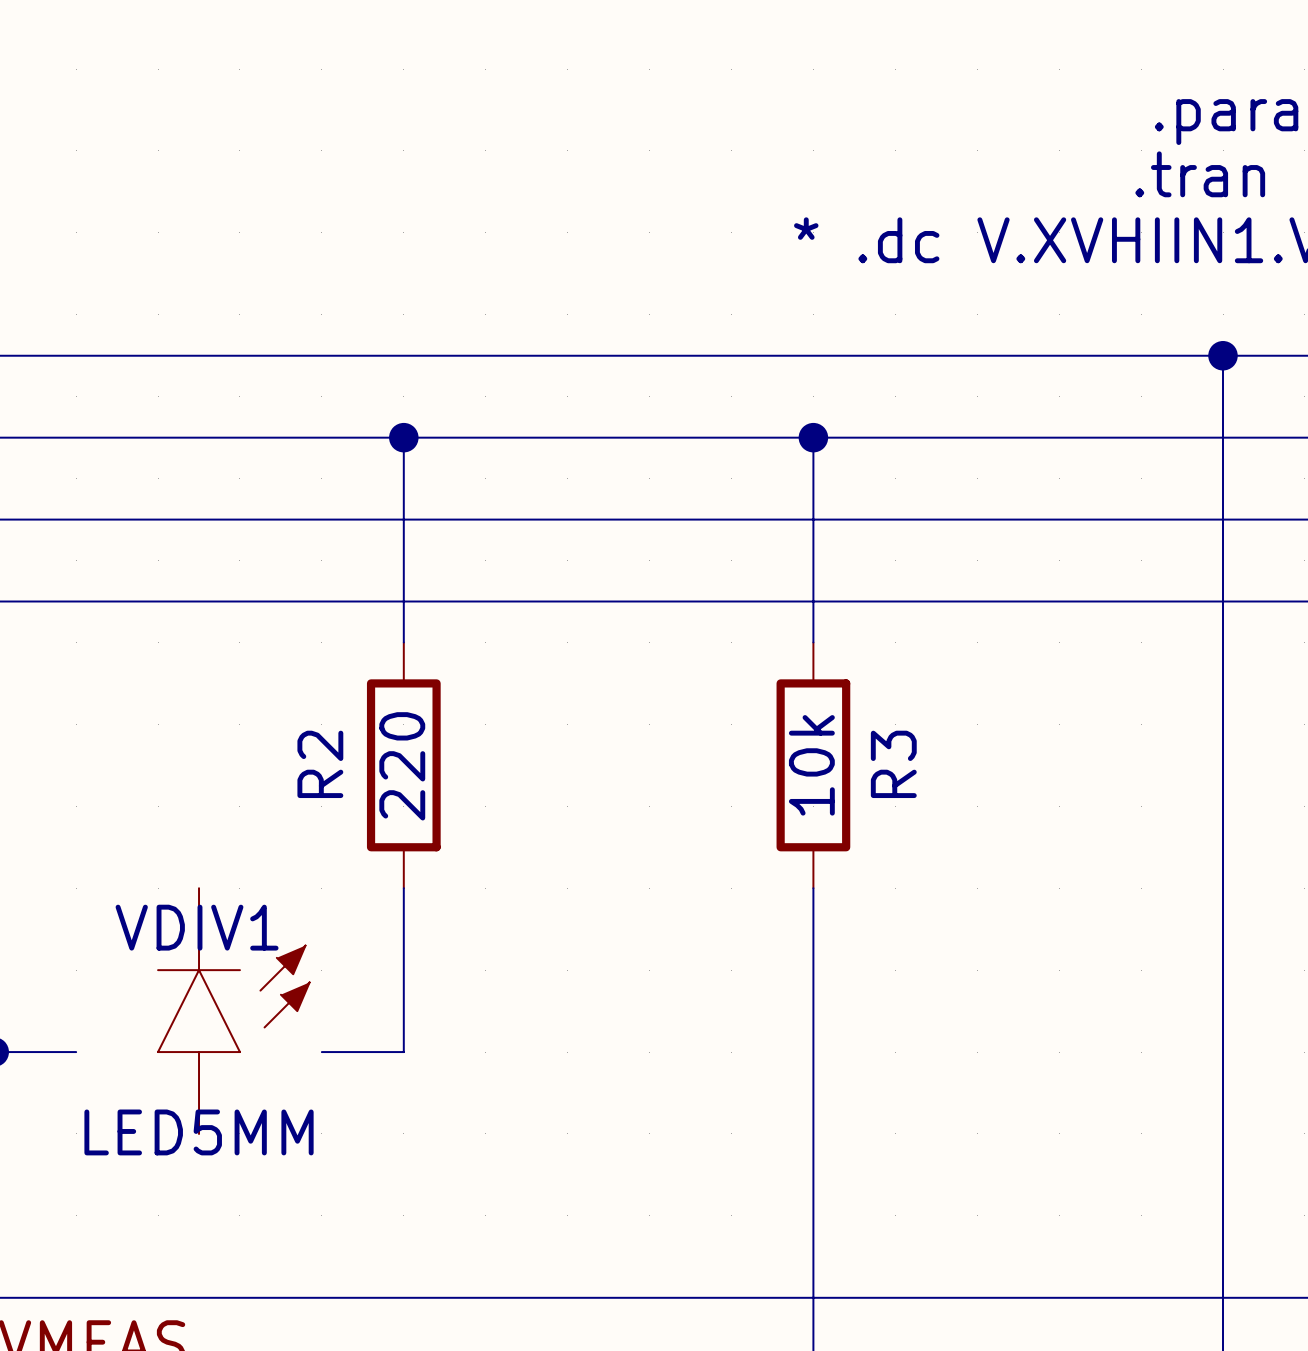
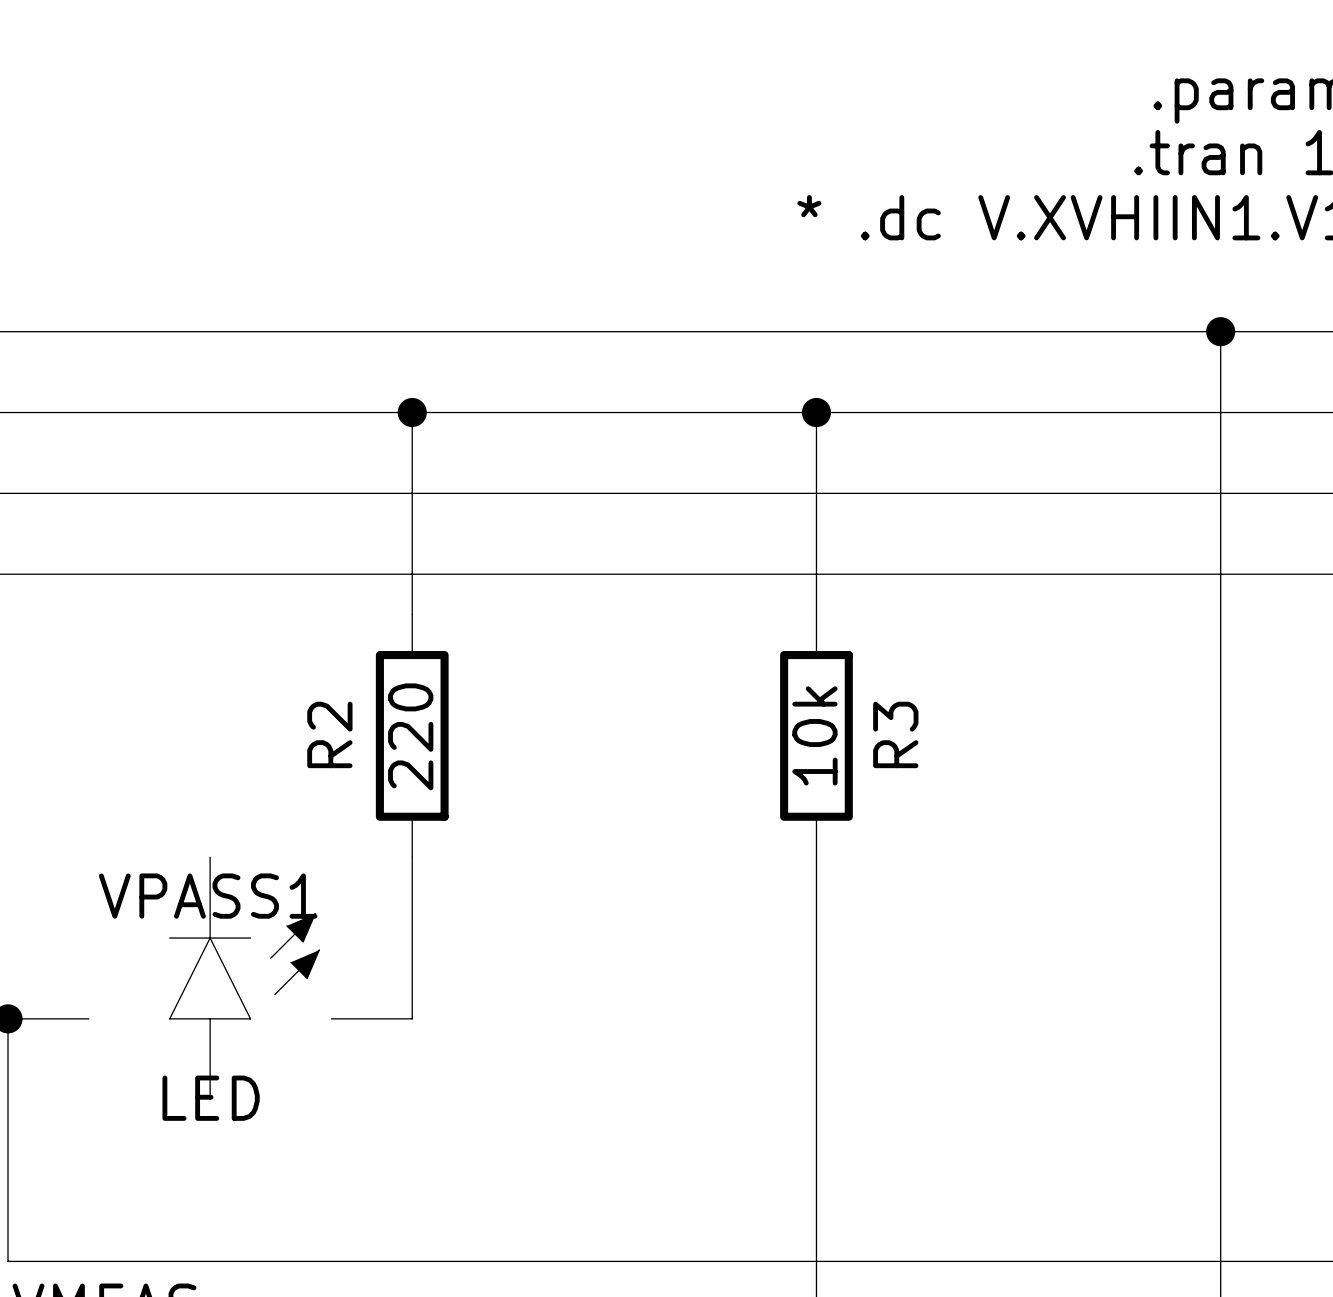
VDIV1 name: VDIV1 (197, 927) -> VPASS1 (208, 896)
VDIV1 value: LED5MM (199, 1132) -> LED (211, 1098)

